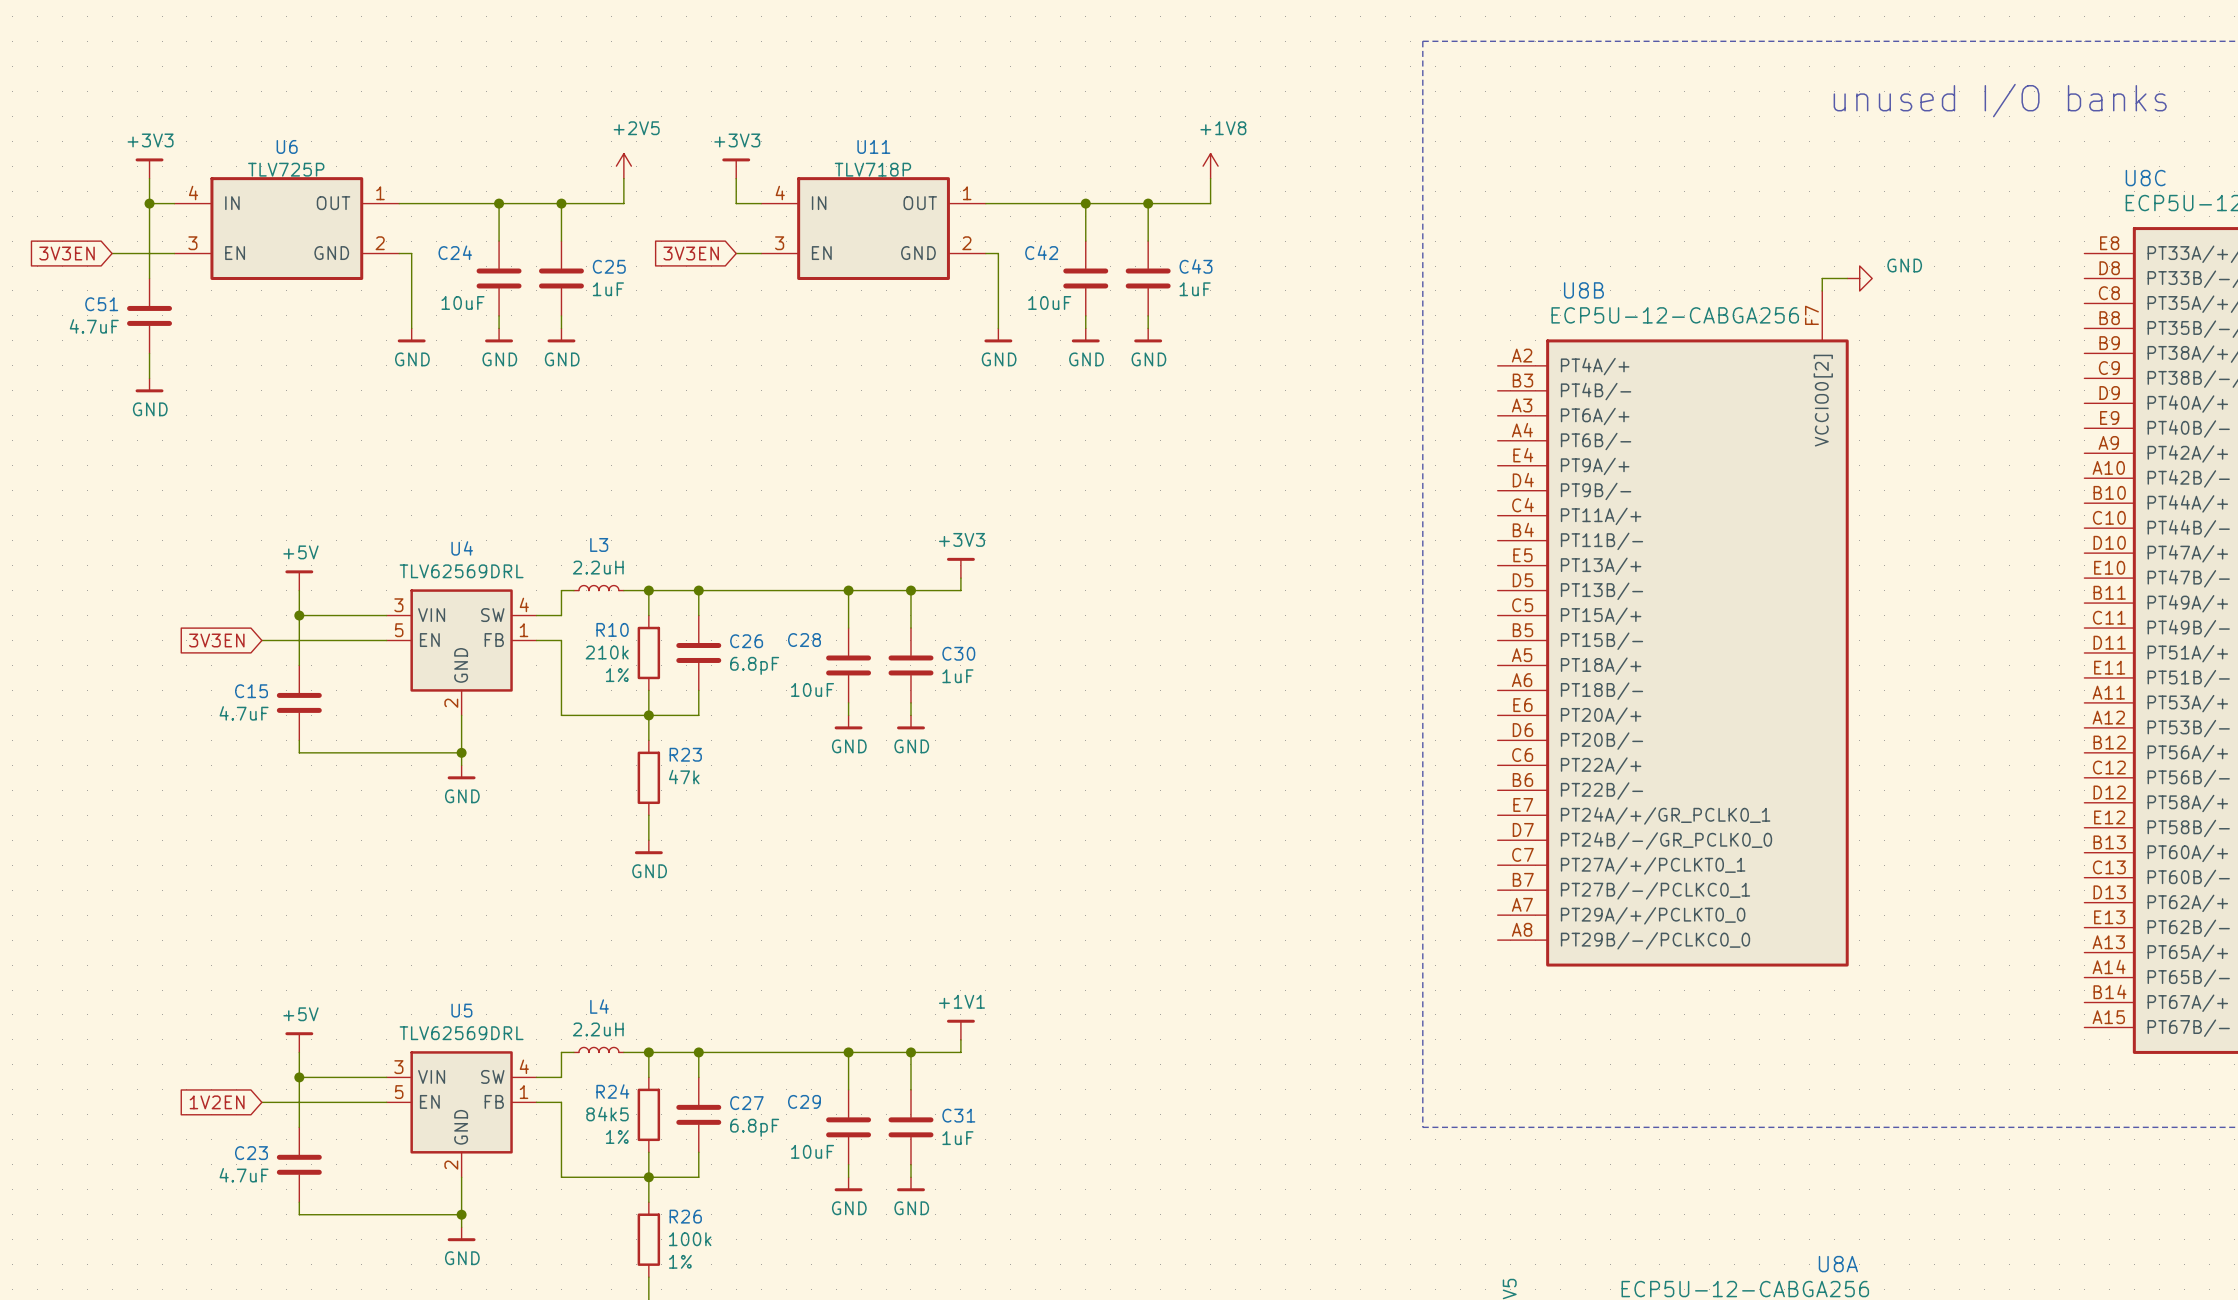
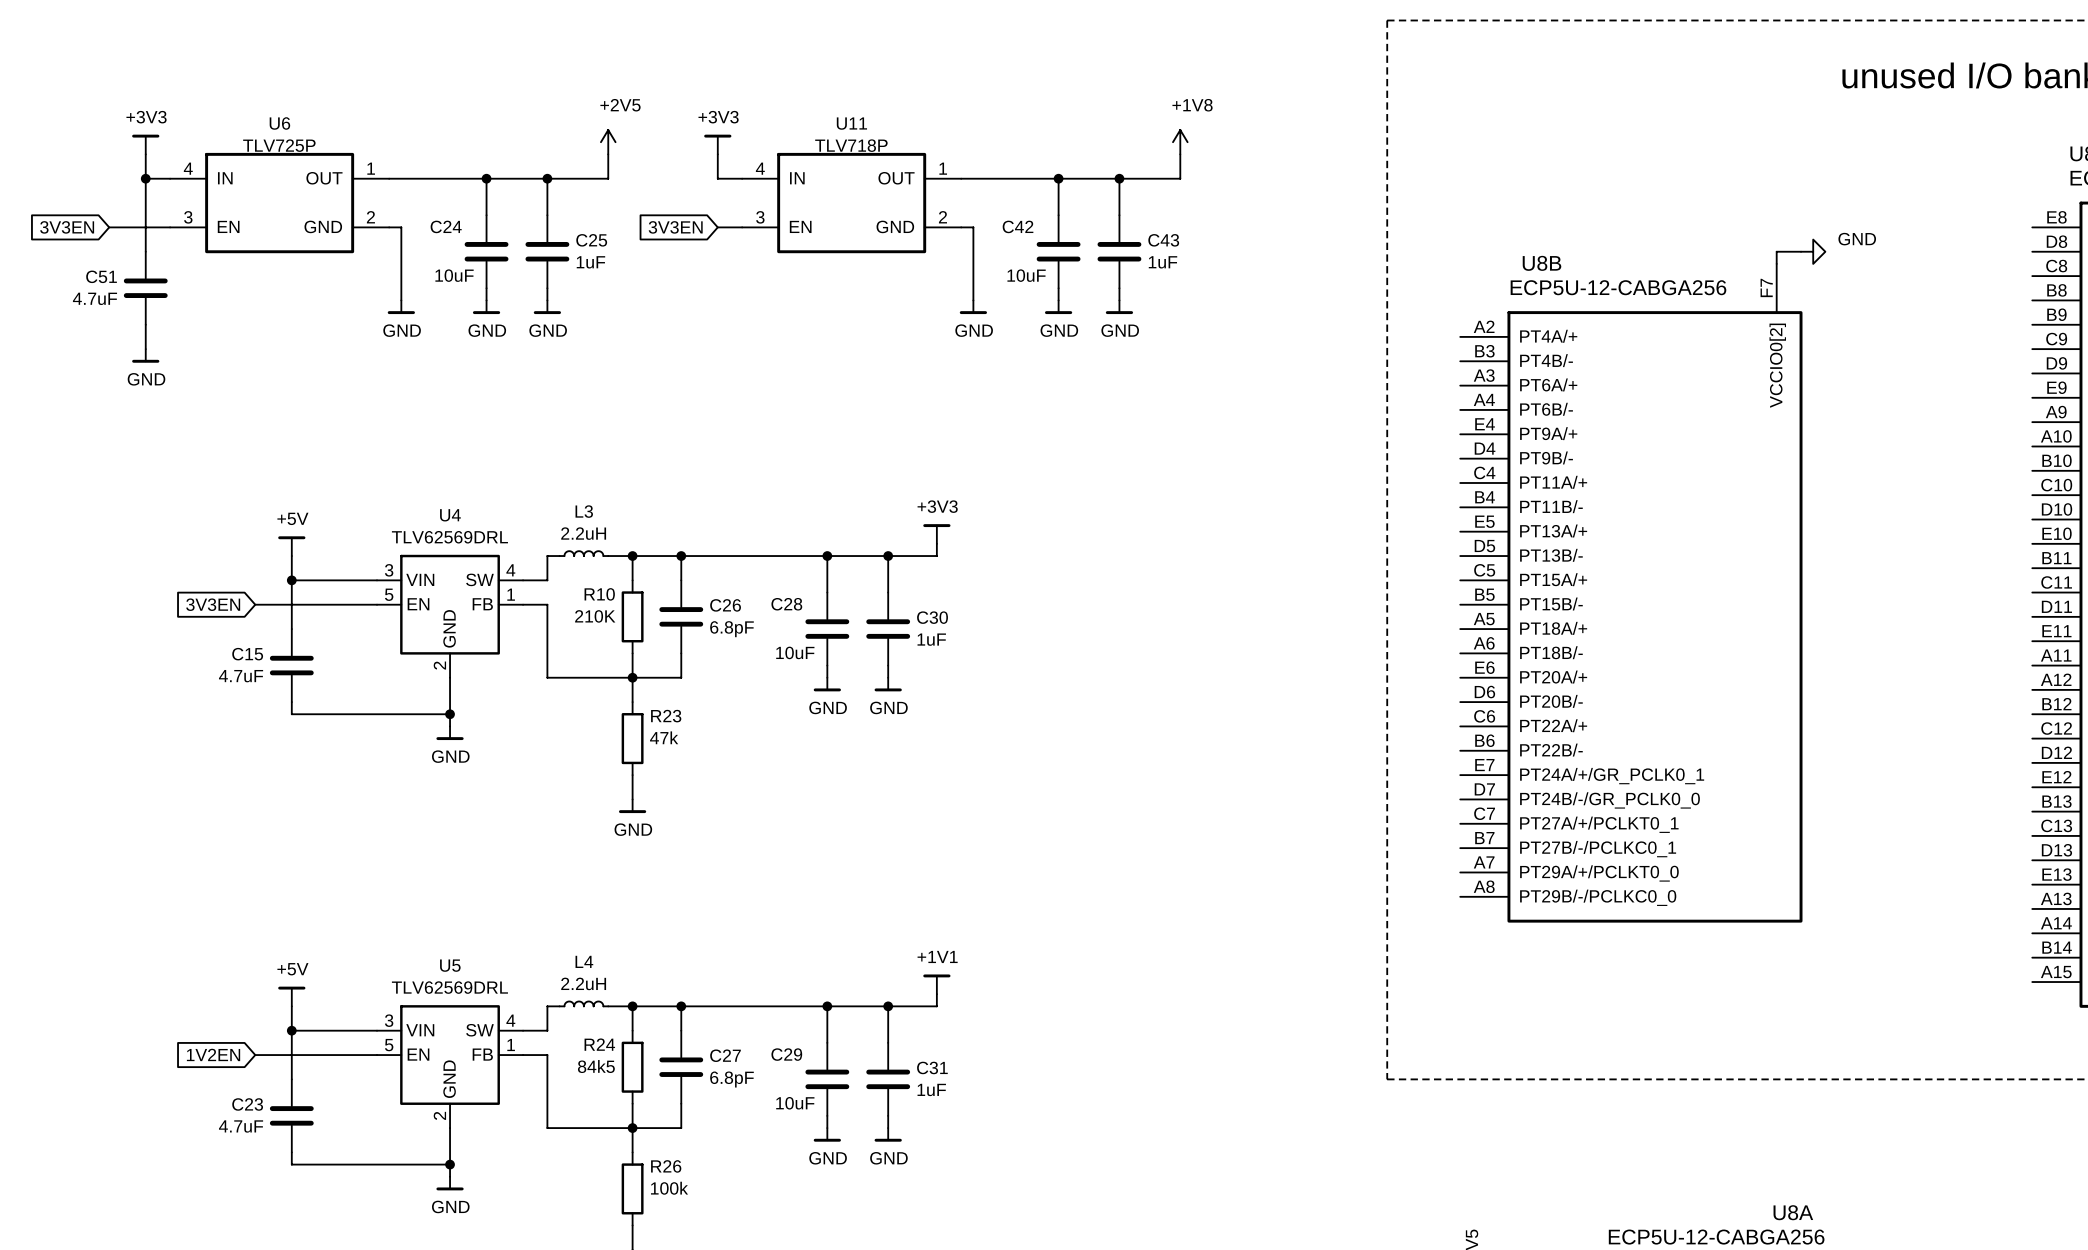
R10 value: 210k (607, 652) -> 210K (595, 616)
R10 text: 1% (617, 675) -> none
R24 text: 1% (617, 1136) -> none
R26 text: 1% (680, 1261) -> none

